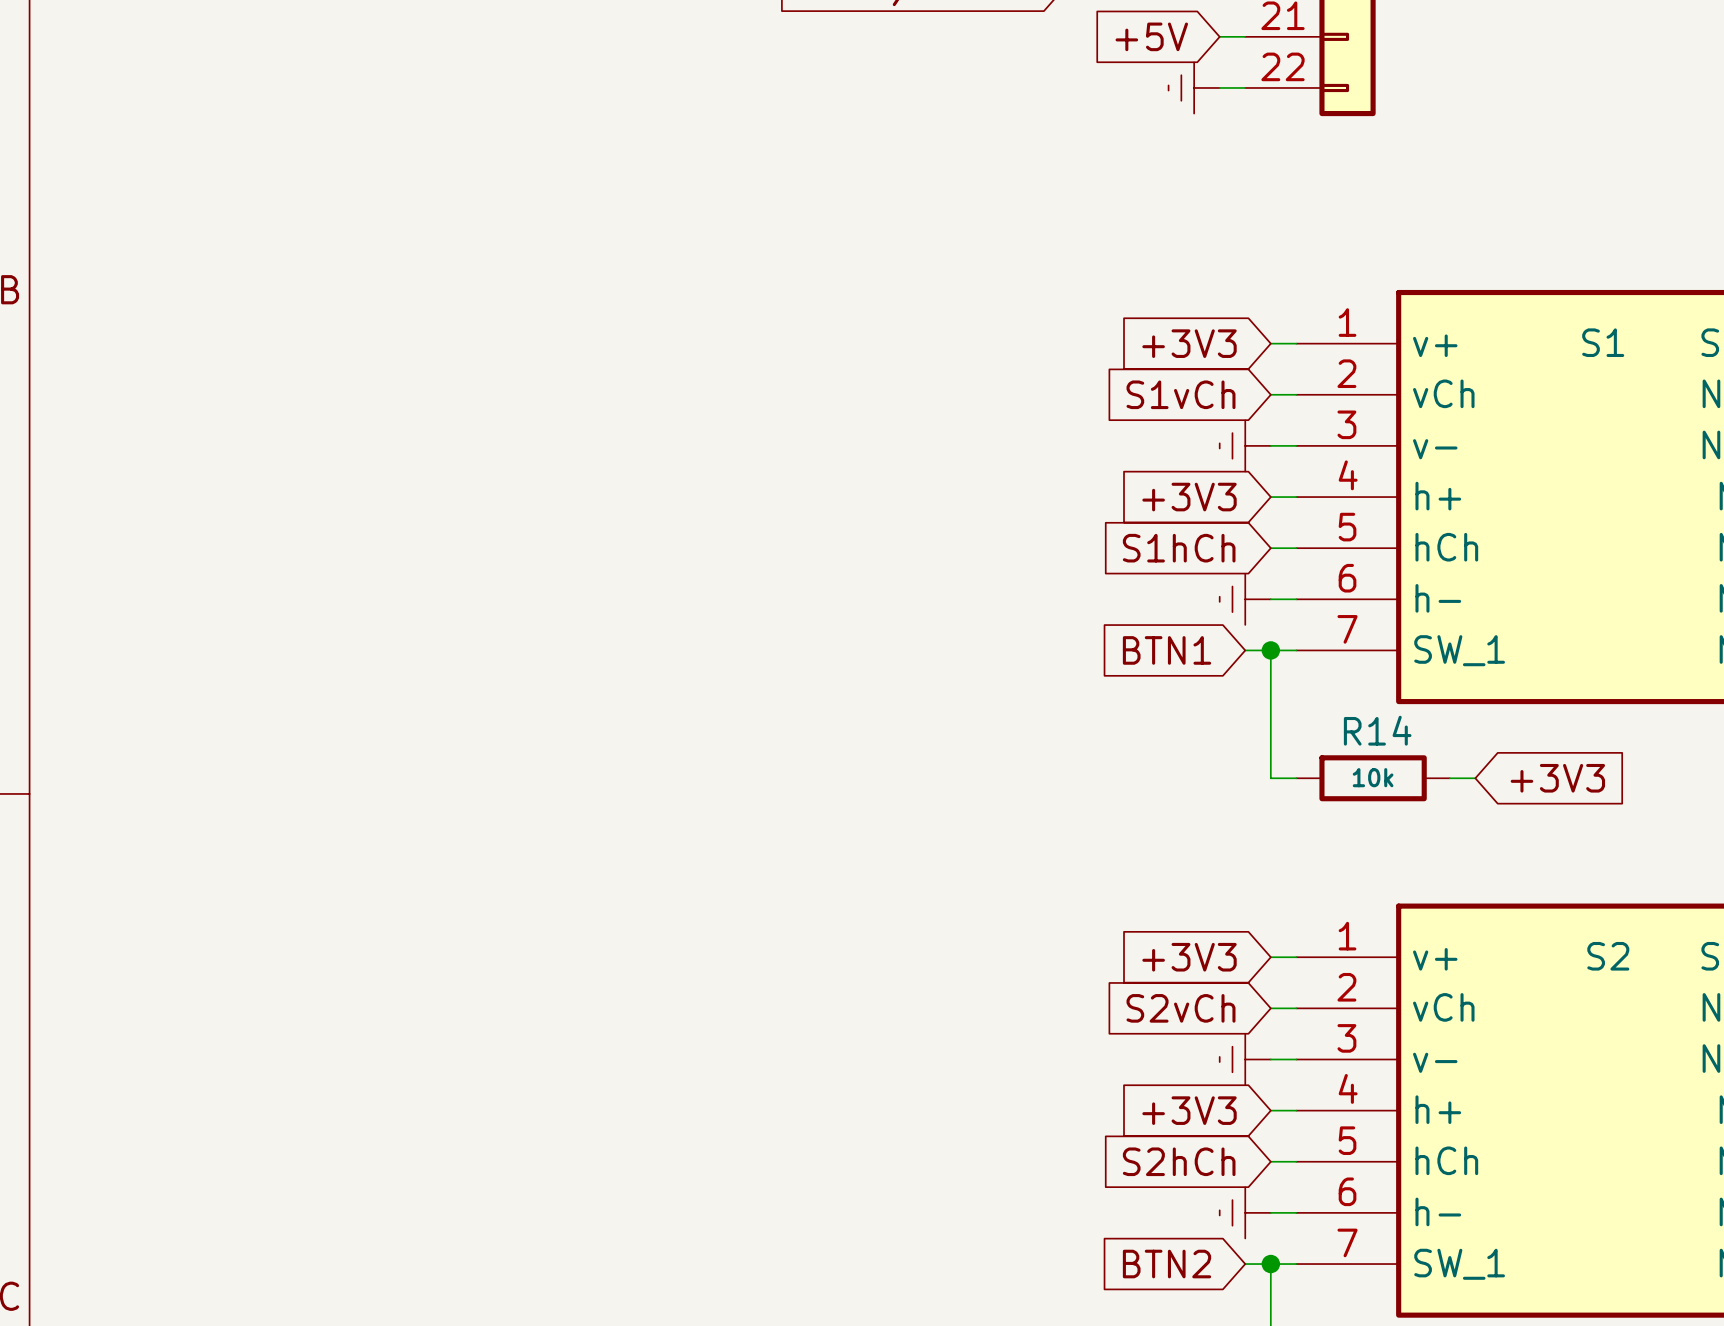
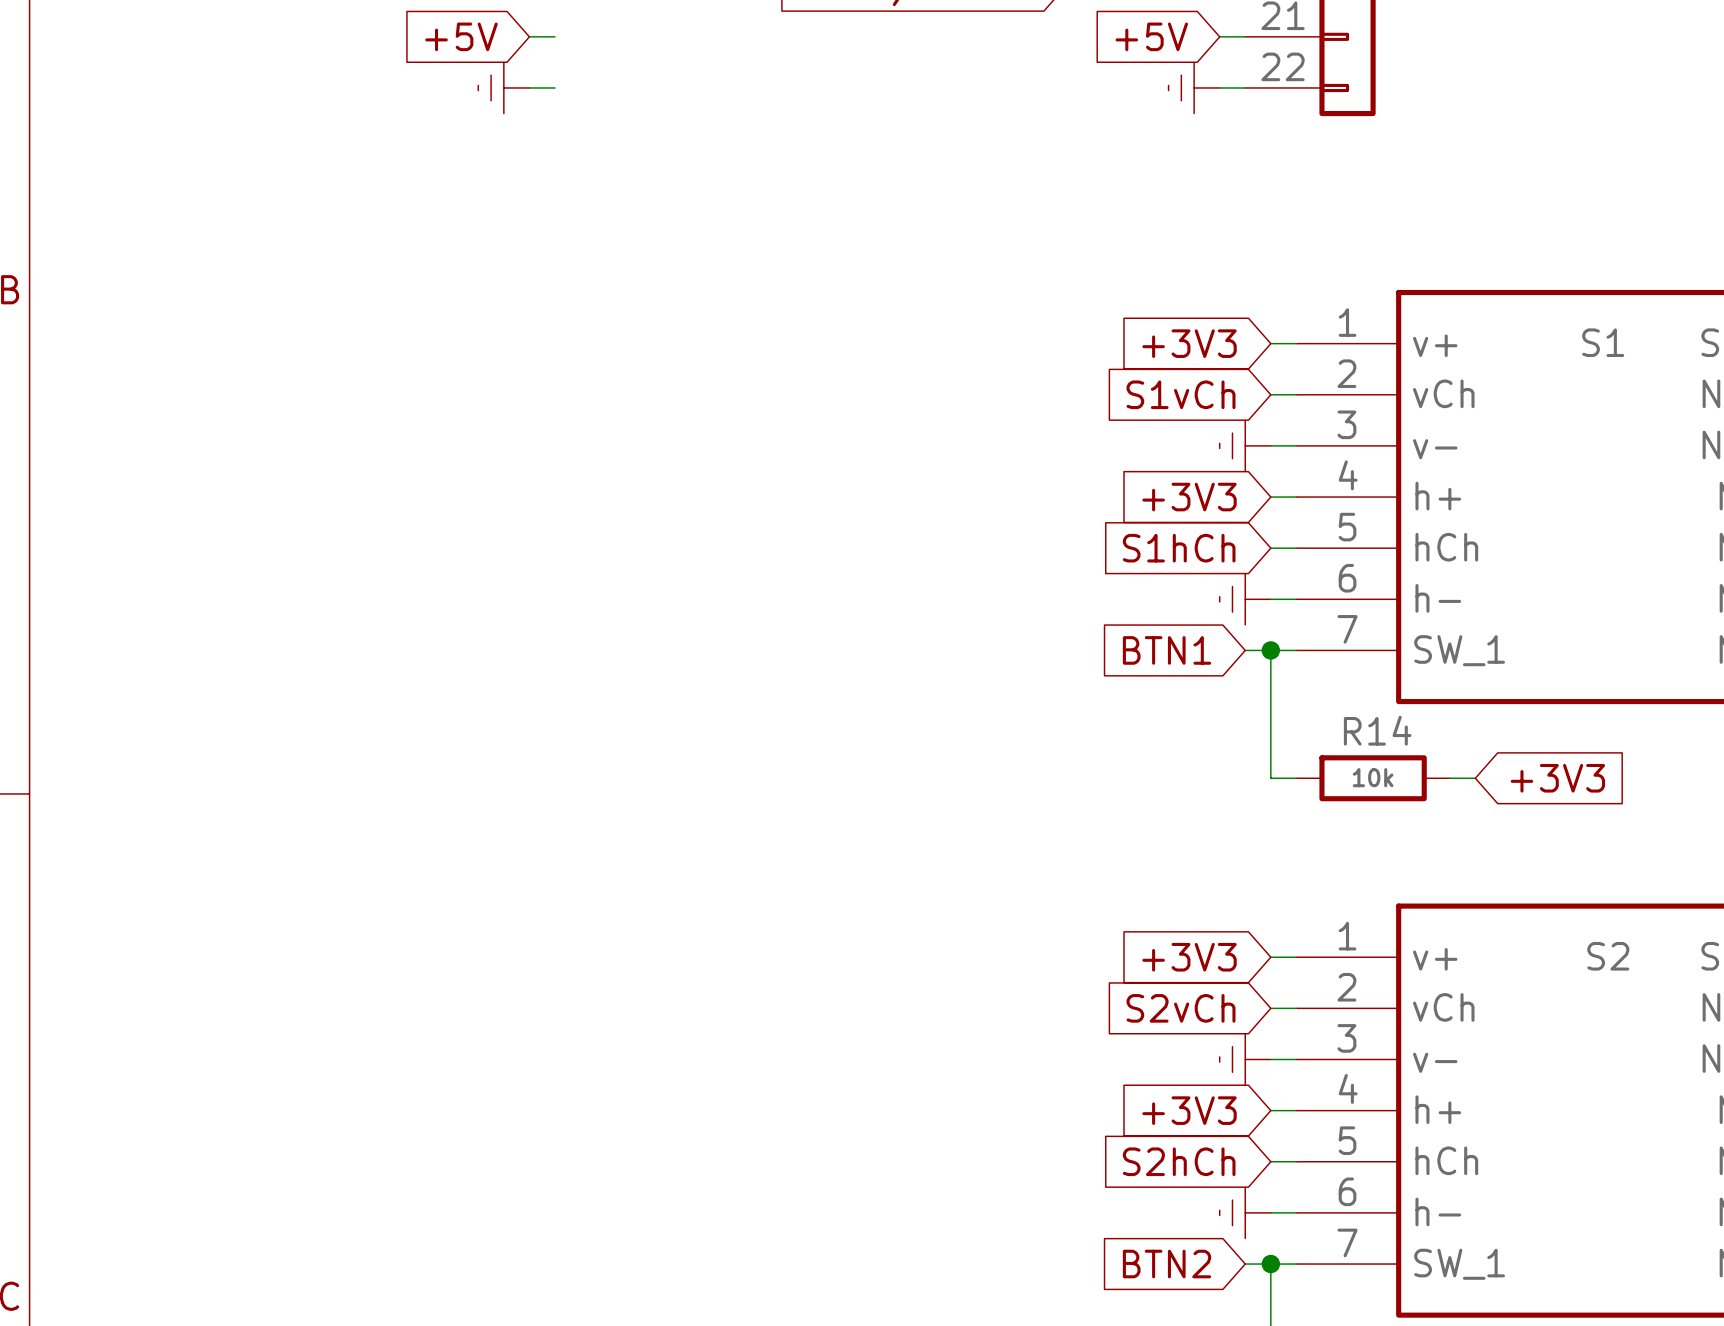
global label: none -> +5V (461, 36)
wire: none -> (529, 36) (554, 36)
power symbol: none -> (503, 87)
wire: none -> (529, 87) (554, 87)

